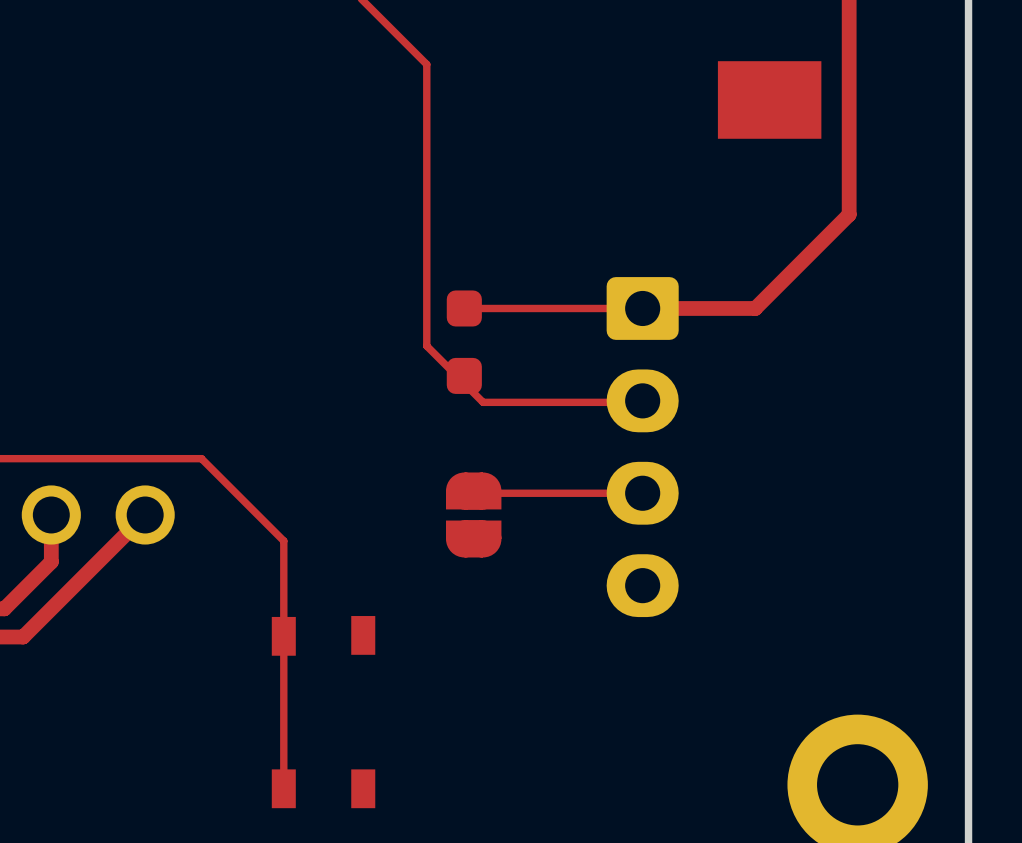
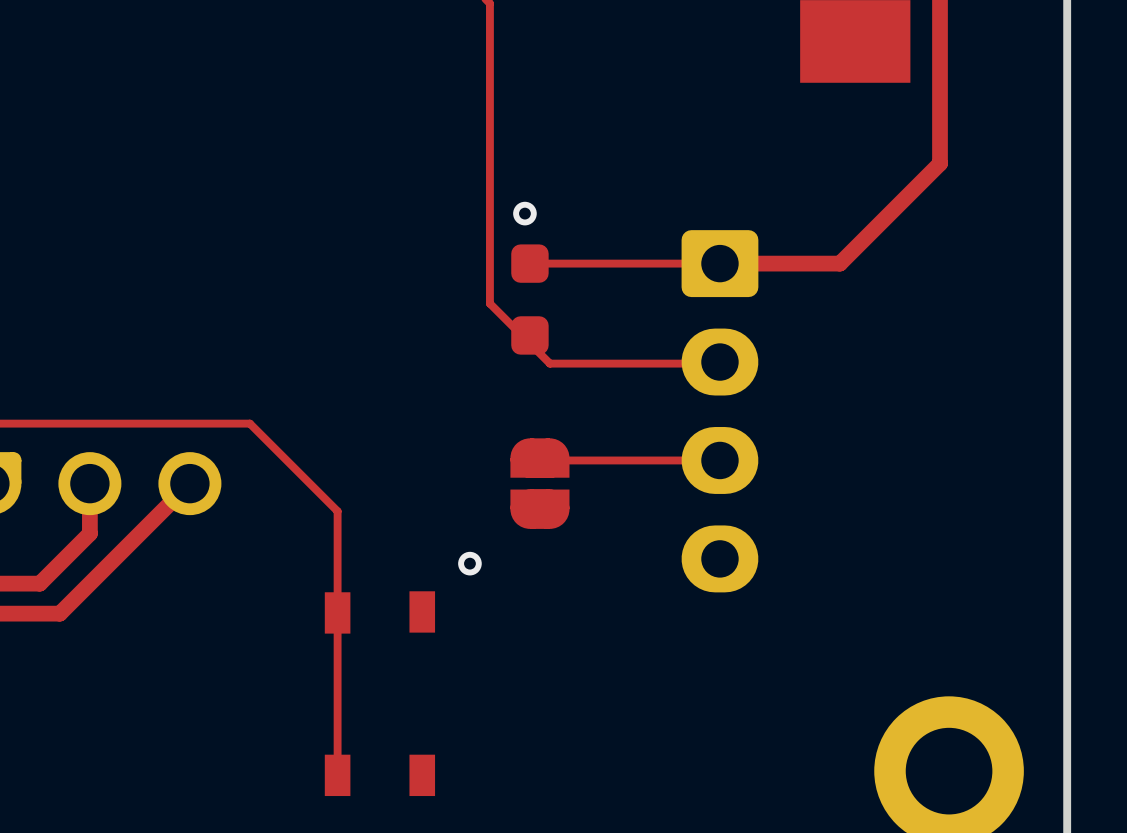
via: none -> (524, 213)
via: none -> (469, 563)

